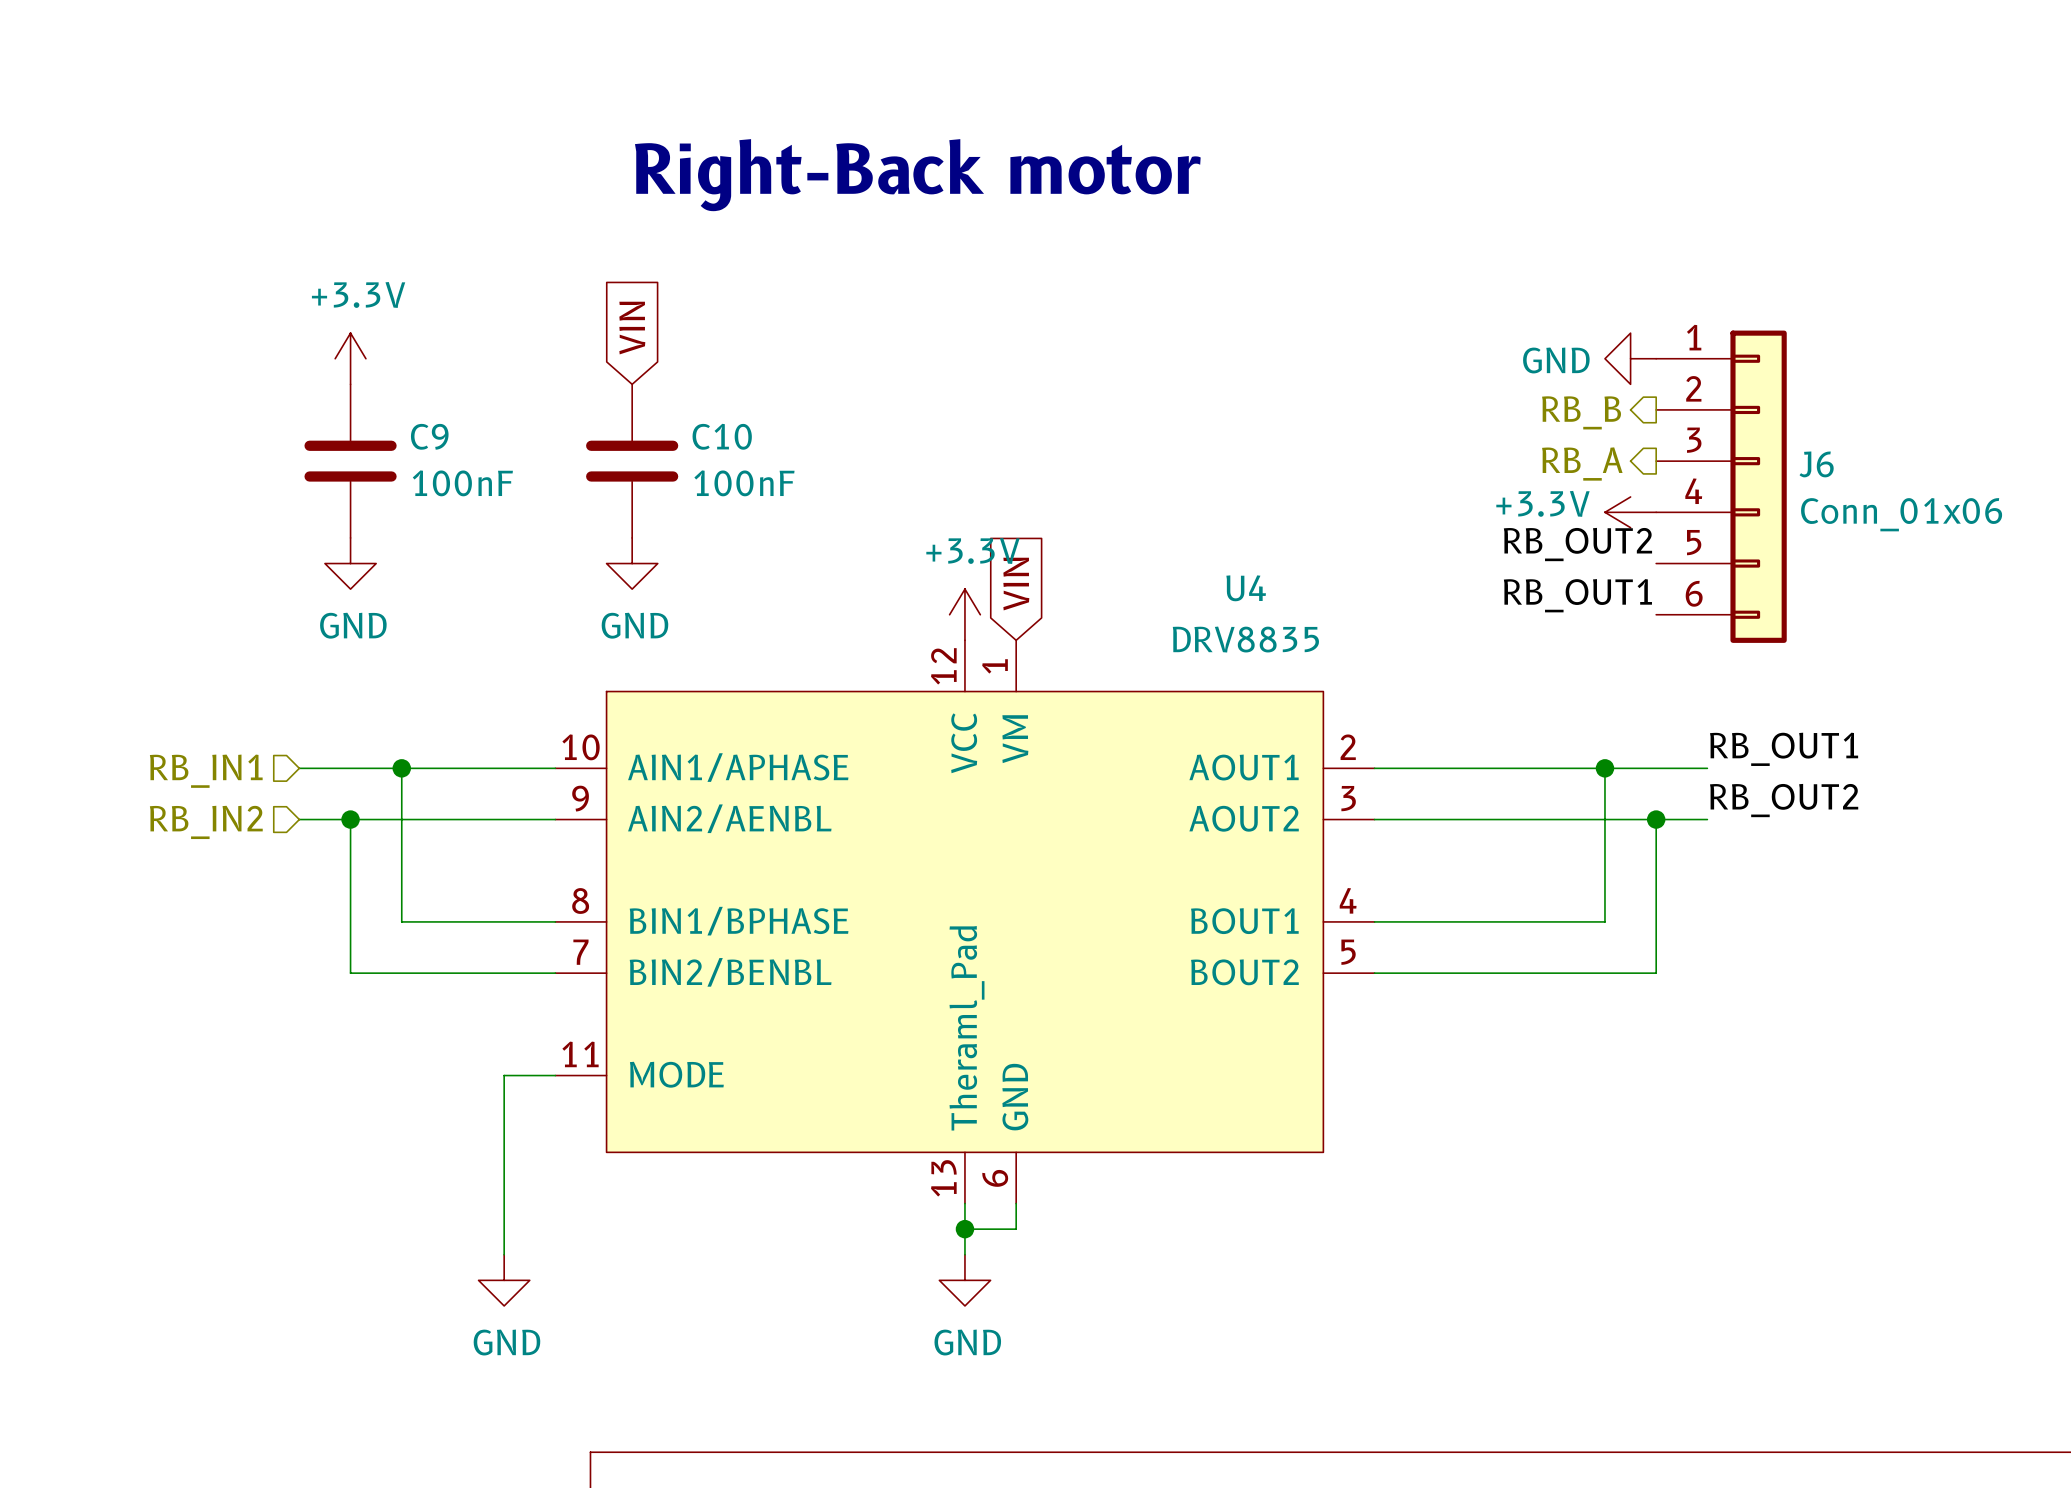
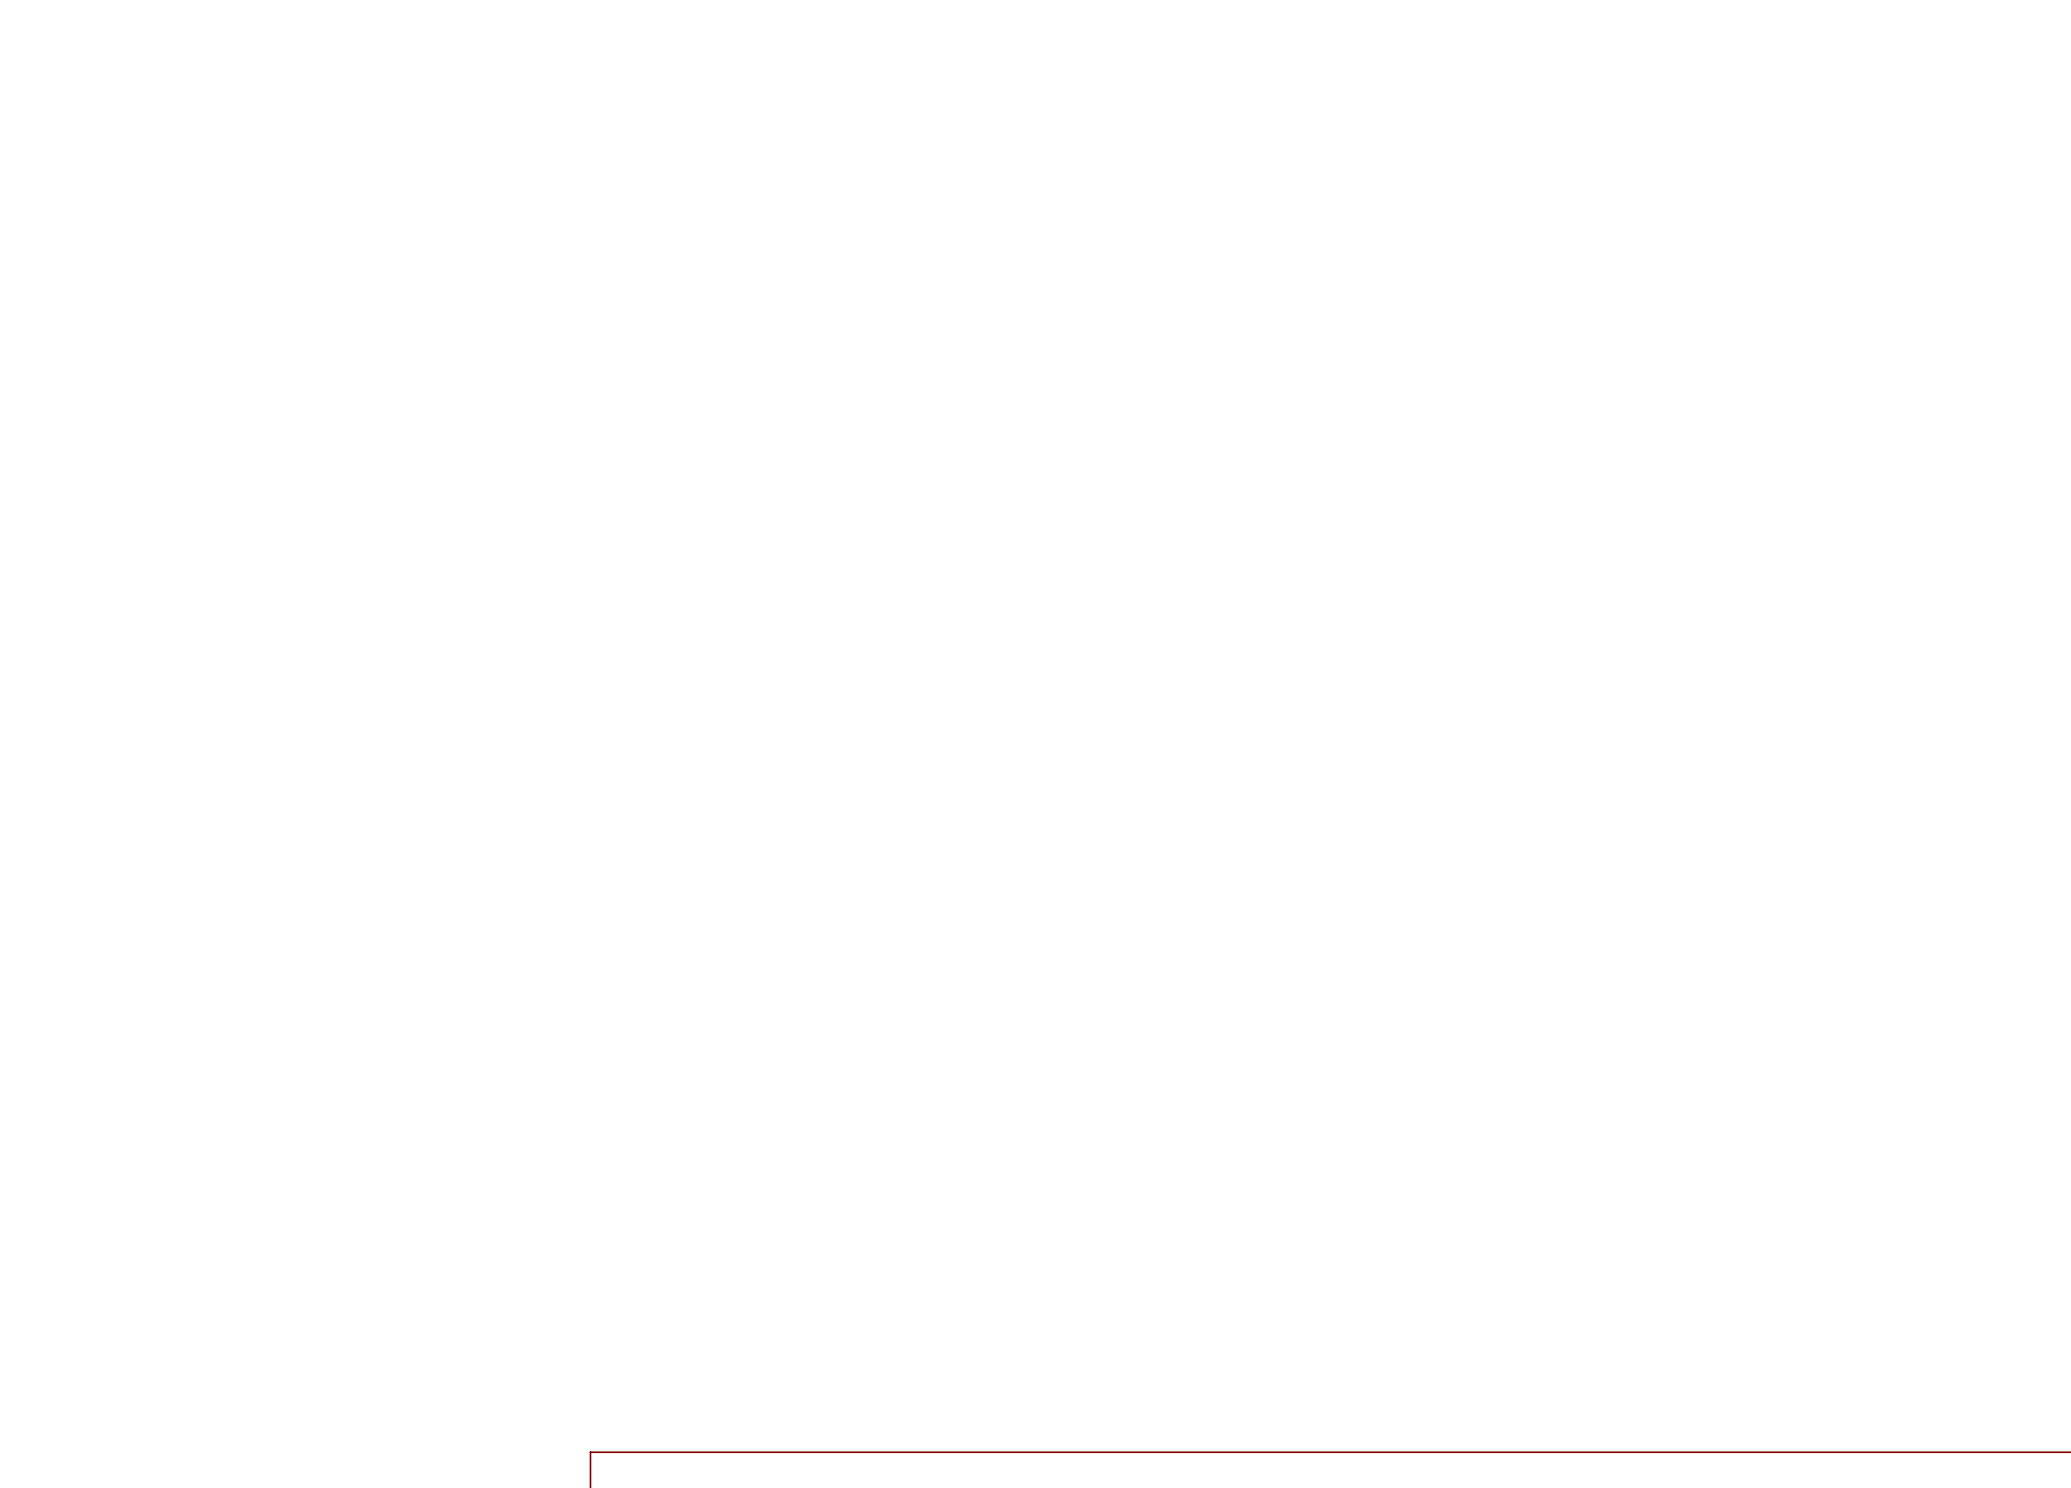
text: Right-Back motor (917, 175) -> none
global label: VIN (632, 328) -> none
power symbol: +3.3V (350, 358) -> none
power symbol: GND (1630, 358) -> none
hierarchical label: RB_B (1581, 412) -> none
C9: 100nF (350, 461) -> none
C10: 100nF (632, 461) -> none
hierarchical label: RB_A (1582, 464) -> none
J6: Conn_01x06 (1721, 486) -> none
power symbol: +3.3V (1630, 512) -> none
label: RB_OUT2 (1577, 544) -> none
power symbol: GND (350, 563) -> none
power symbol: GND (632, 563) -> none
global label: VIN (1016, 584) -> none
label: RB_OUT1 (1577, 595) -> none
power symbol: +3.3V (964, 614) -> none
label: RB_OUT1 (1784, 749) -> none
wire: (299, 768) (555, 768) -> none
wire: (401, 768) (401, 921) (555, 921) -> none
junction: (401, 768) -> none
wire: (1374, 768) (1707, 768) -> none
wire: (1604, 768) (1604, 921) (1374, 921) -> none
junction: (1604, 768) -> none
hierarchical label: RB_IN1 (206, 771) -> none
label: RB_OUT2 (1784, 800) -> none
wire: (299, 819) (555, 819) -> none
wire: (350, 819) (350, 973) (555, 973) -> none
junction: (350, 819) -> none
wire: (1374, 819) (1707, 819) -> none
wire: (1656, 819) (1656, 973) (1374, 973) -> none
junction: (1656, 819) -> none
hierarchical label: RB_IN2 (206, 822) -> none
U4: DRV8835 (964, 921) -> none
wire: (555, 1075) (504, 1075) (504, 1254) -> none
wire: (964, 1203) (964, 1254) -> none
wire: (1016, 1203) (1016, 1229) (964, 1229) -> none
junction: (964, 1229) -> none
power symbol: GND (504, 1280) -> none
power symbol: GND (964, 1280) -> none

